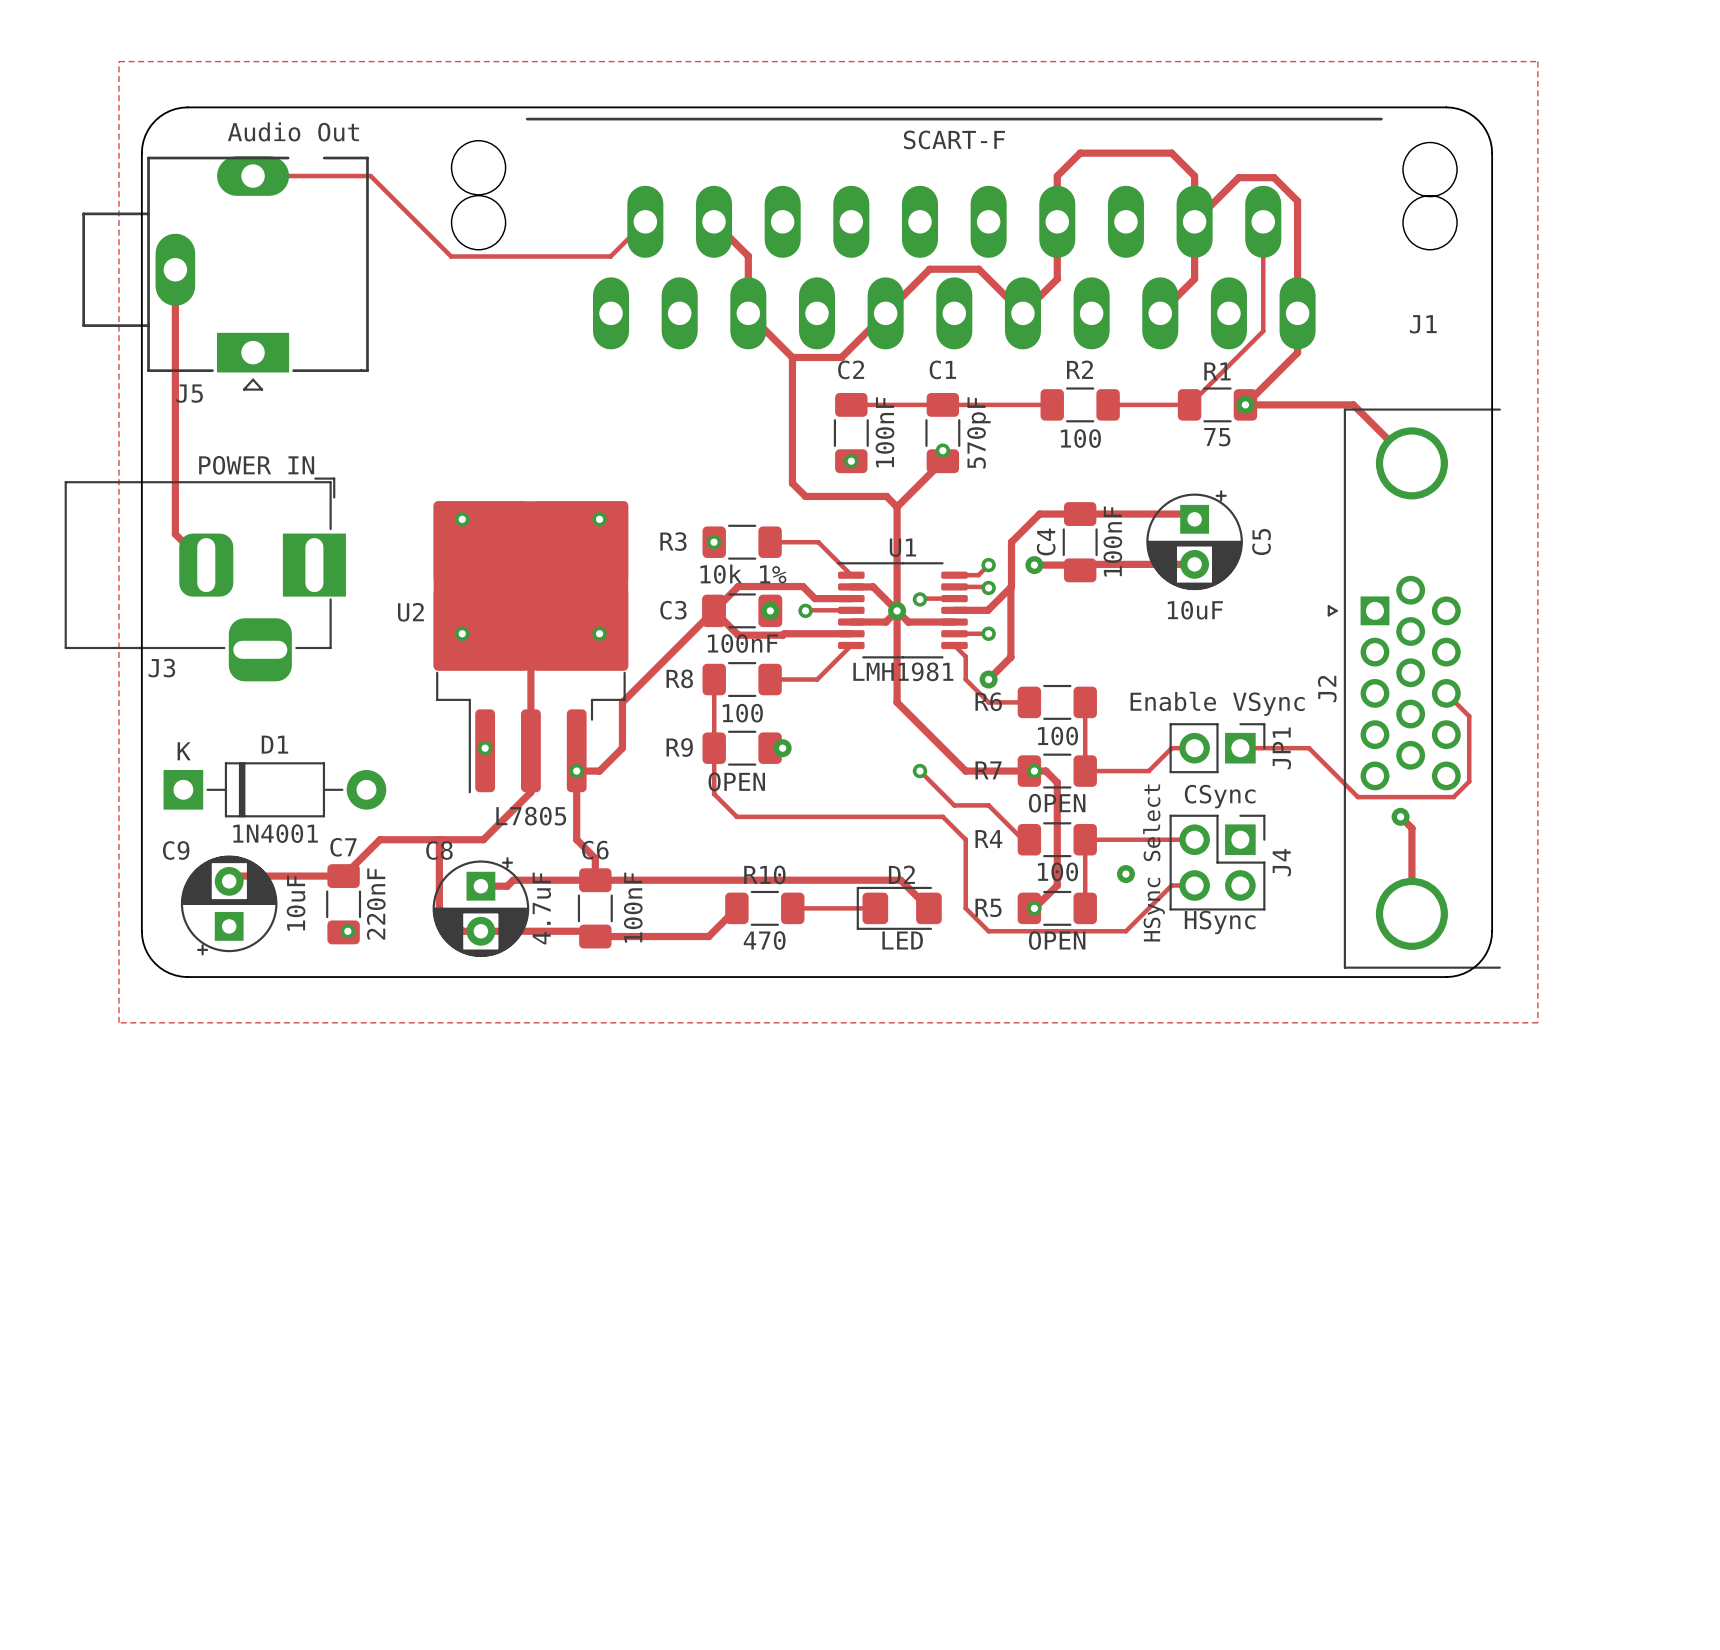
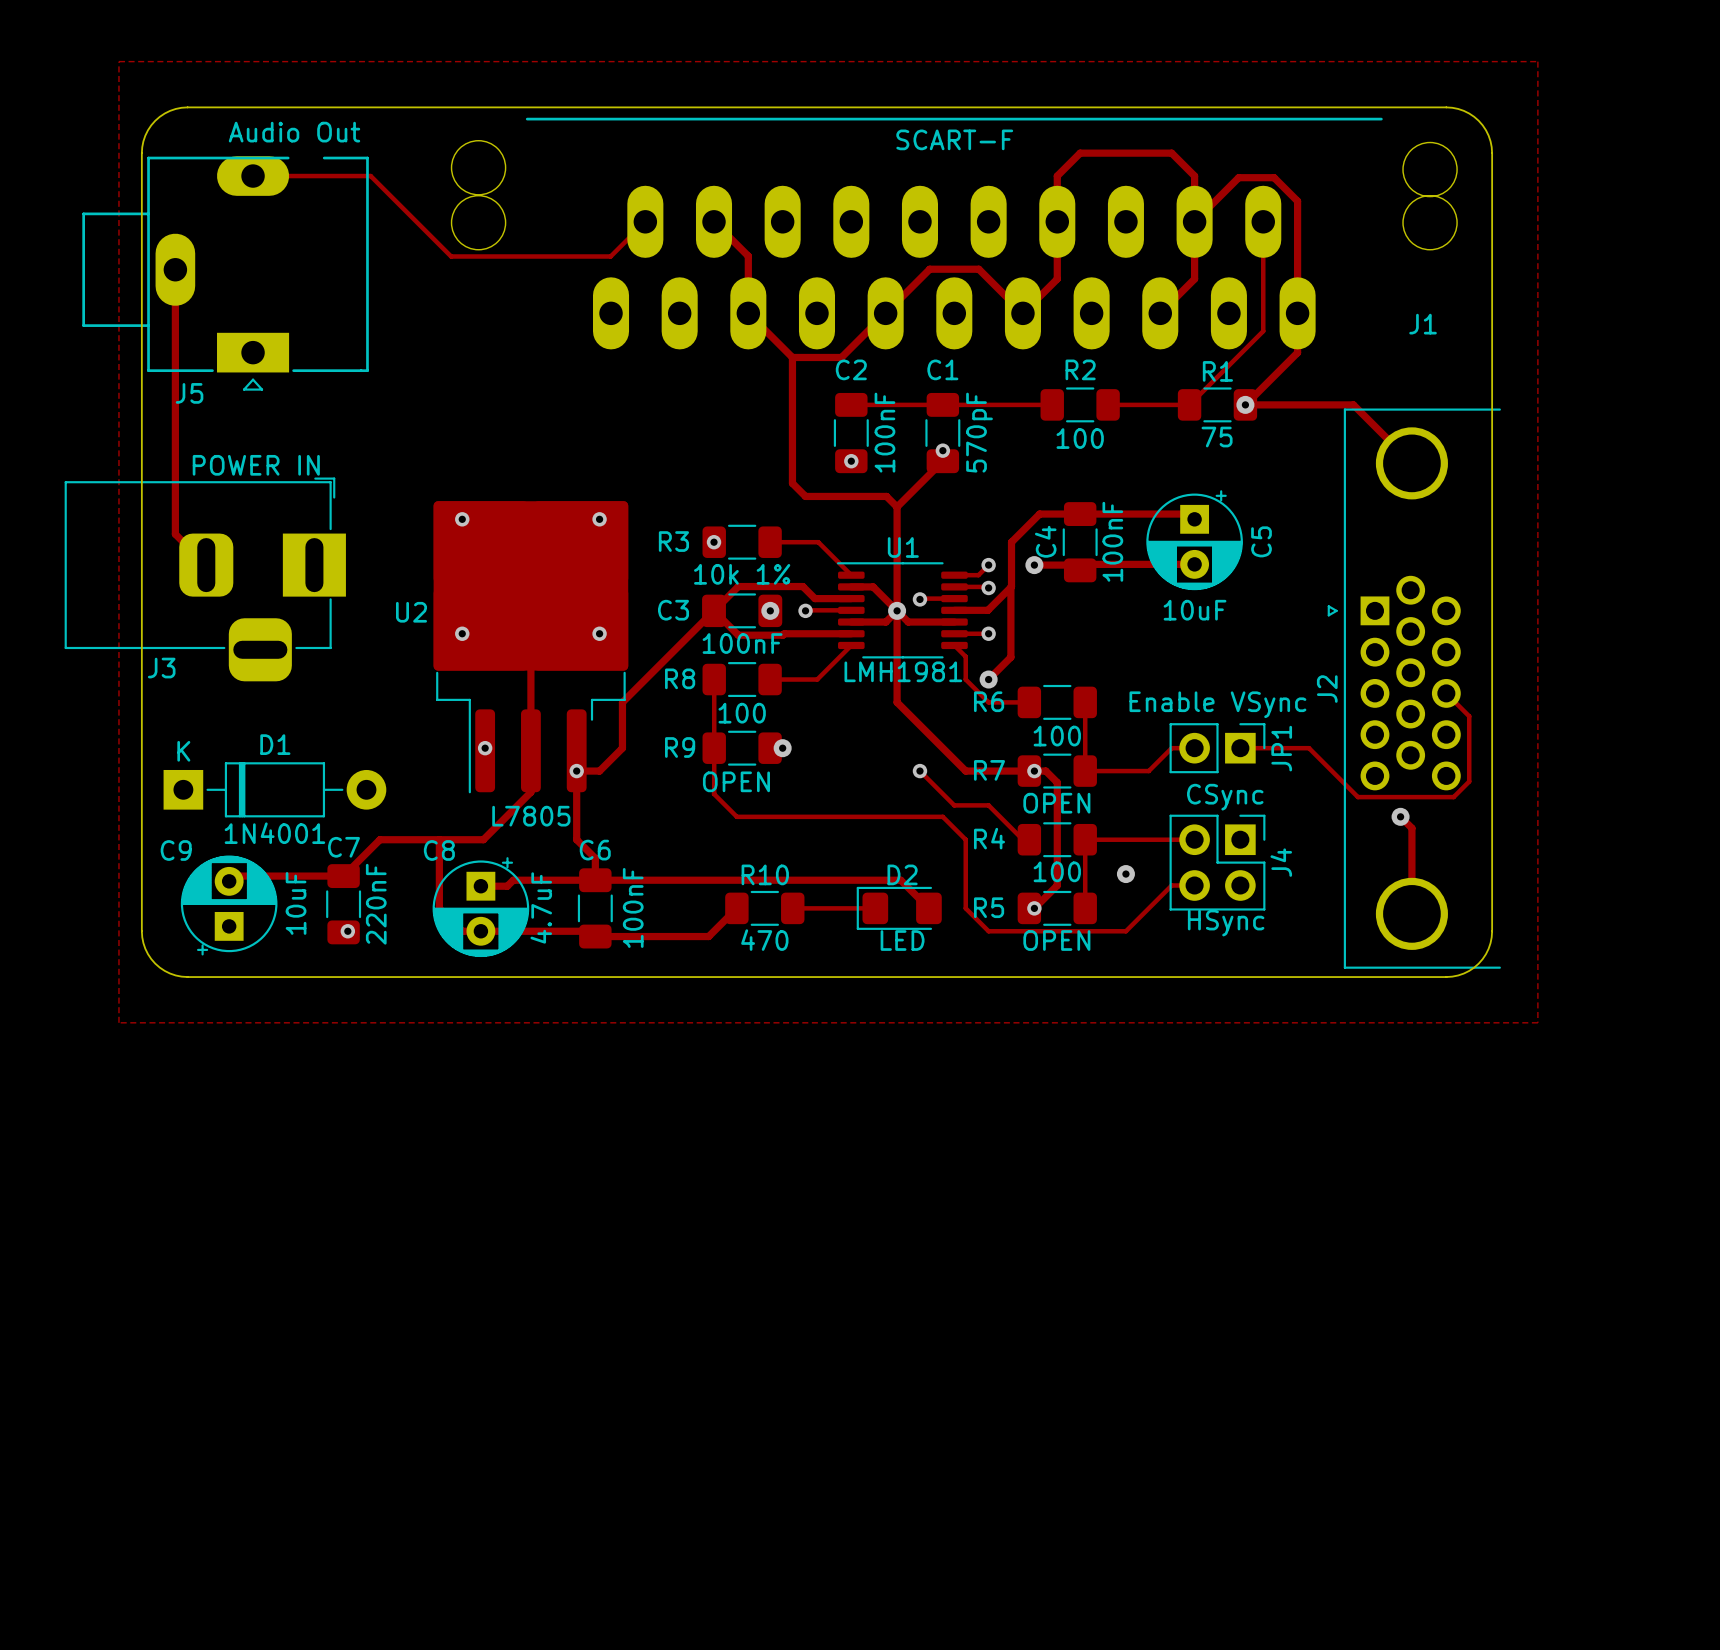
J4 value: HSync Select (1153, 862) -> none

